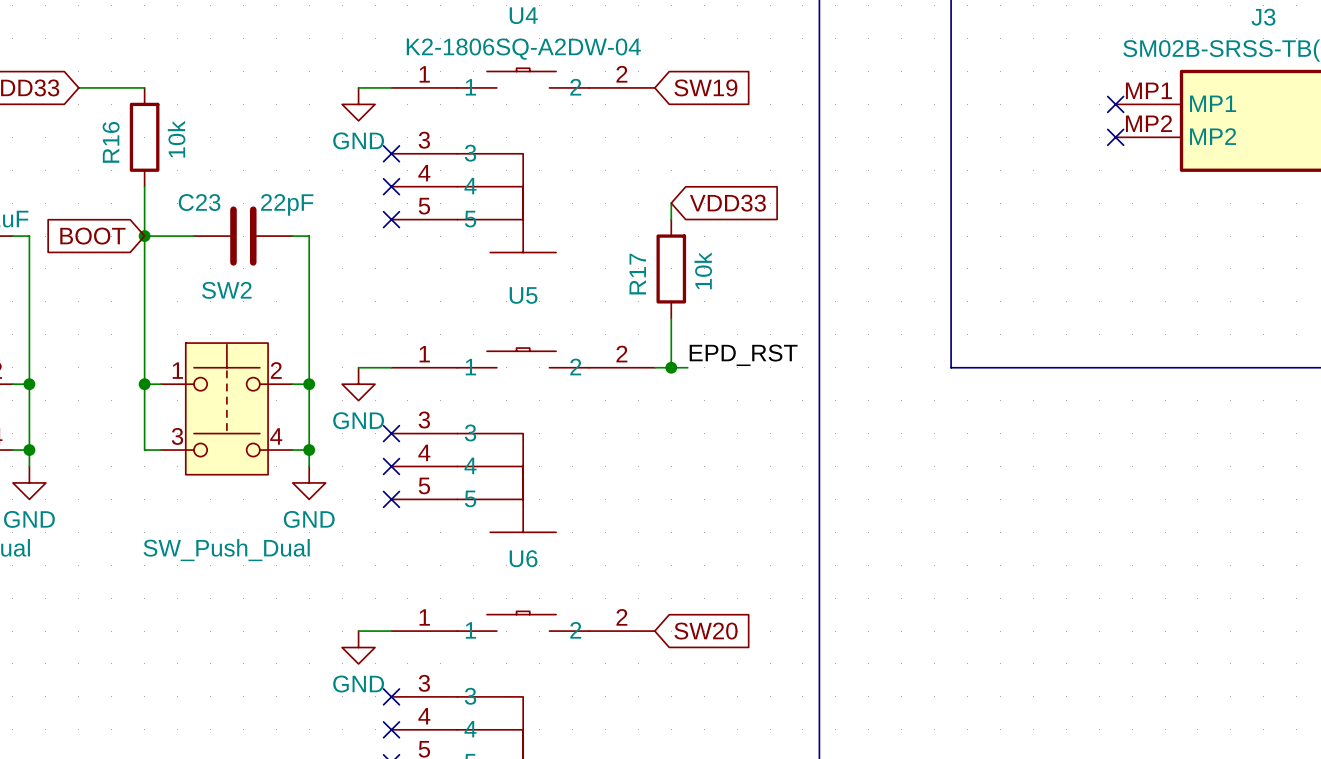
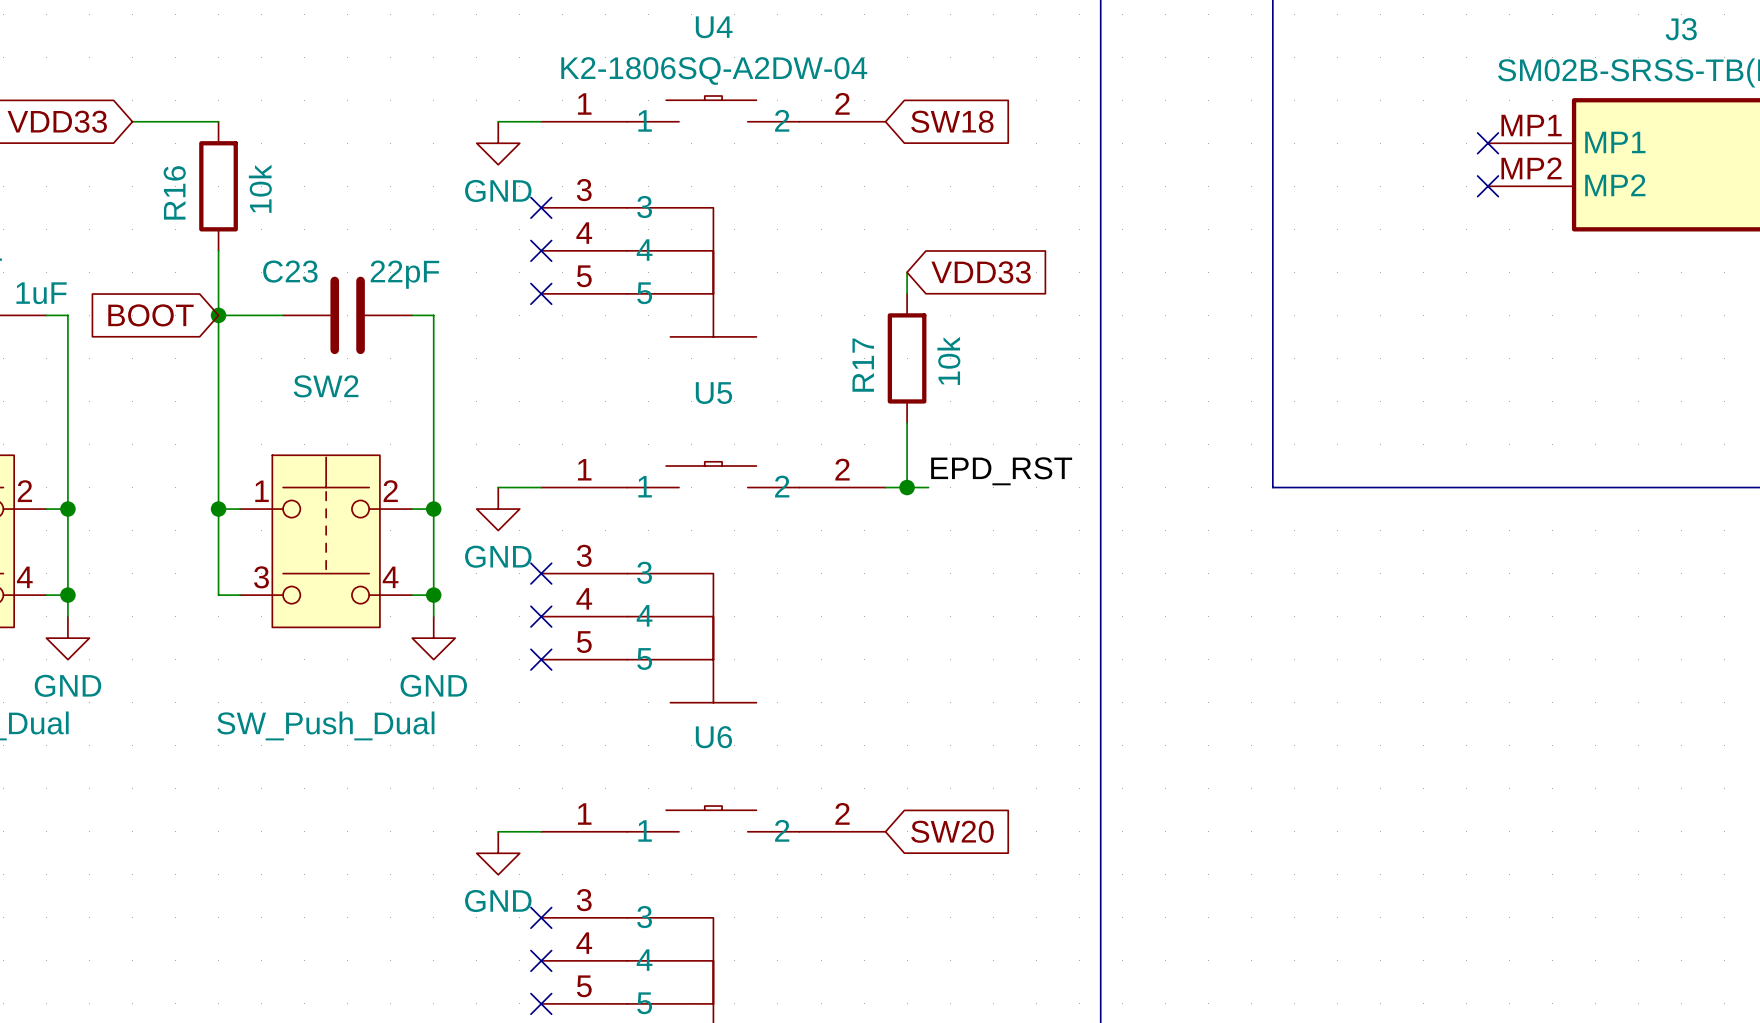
global label: SW19 (705, 87) -> SW18 (952, 121)

